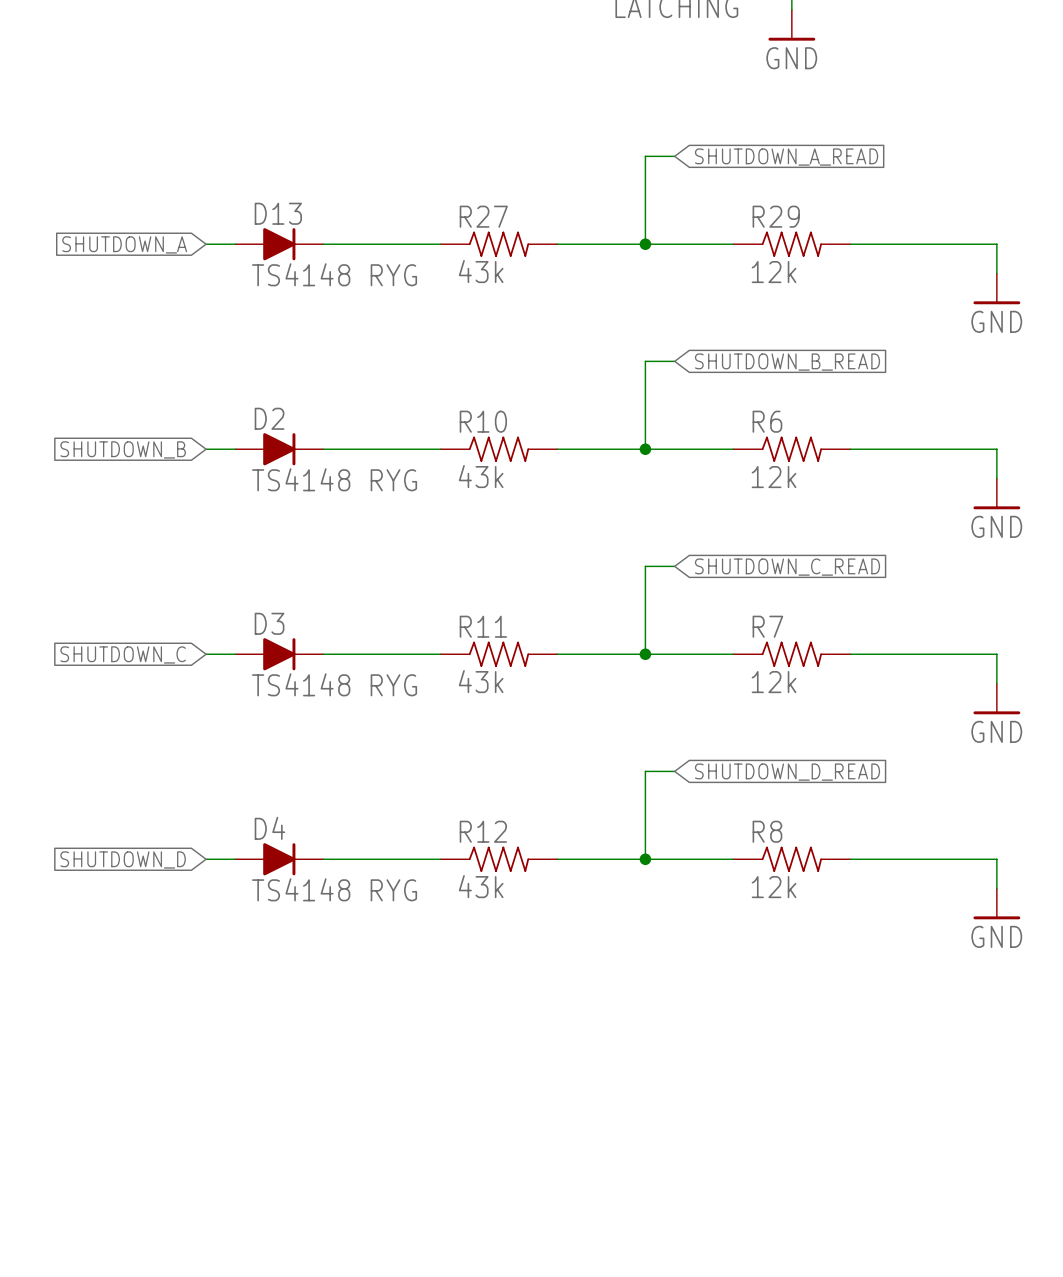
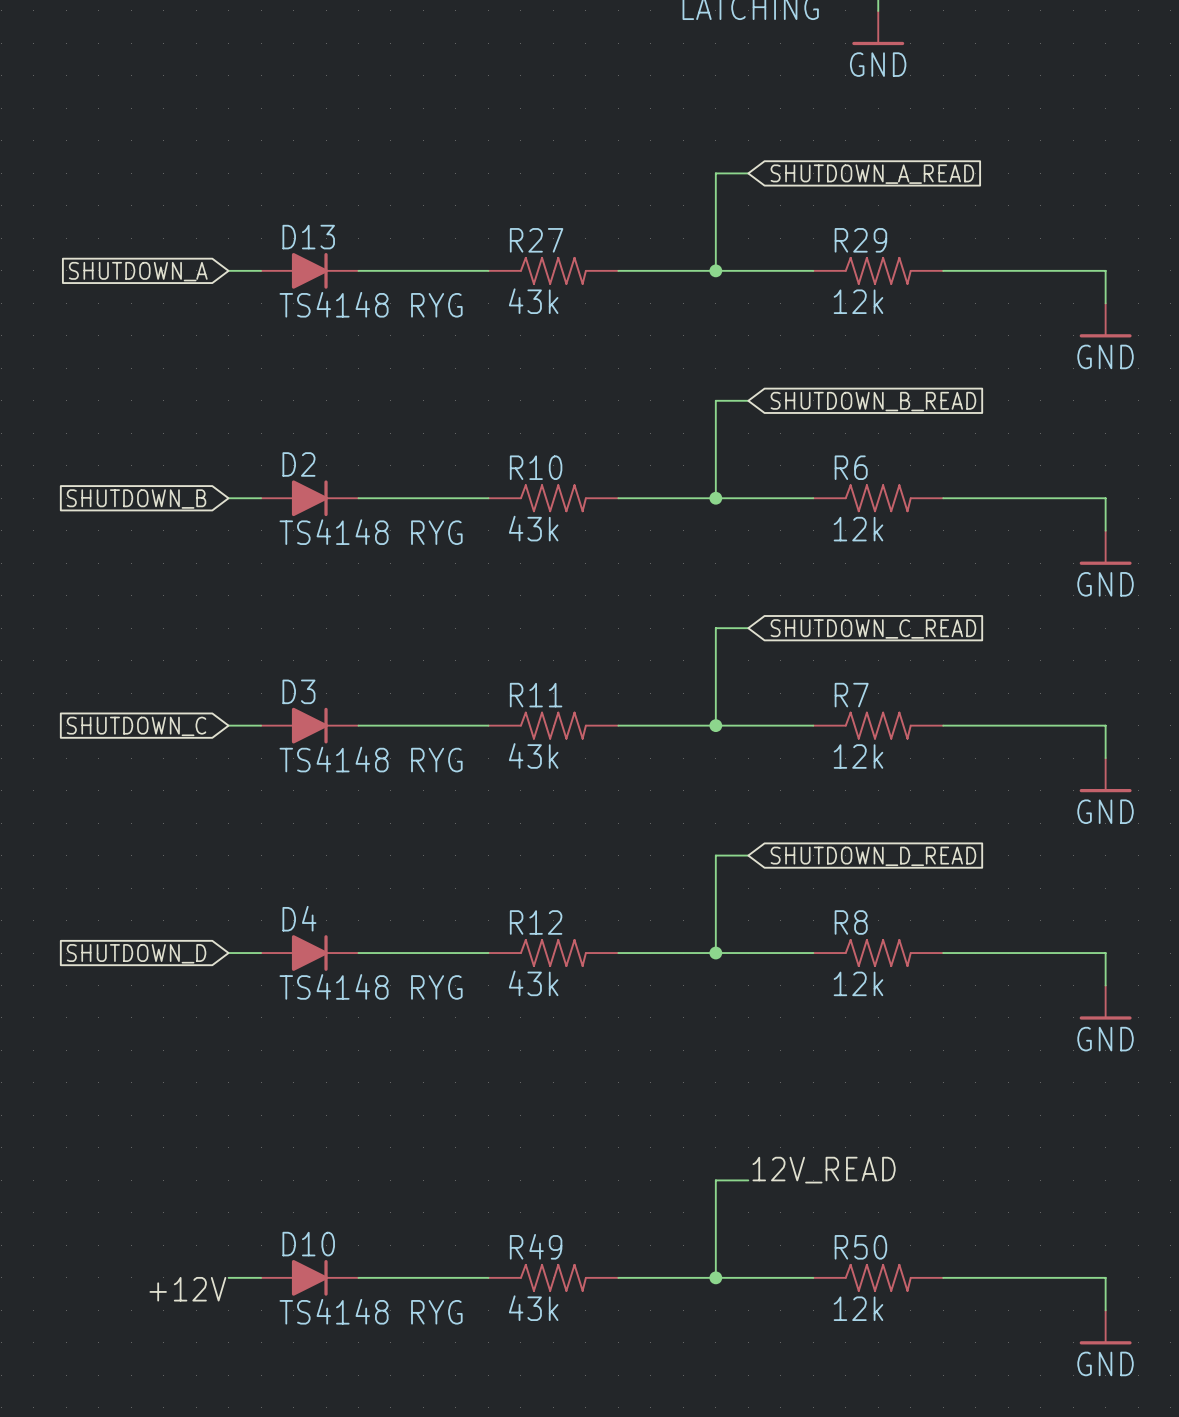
label: none -> 12V_READ (824, 1170)
wire: none -> (748, 1180) (715, 1180) (715, 1277)
wire: none -> (228, 1277) (261, 1277)
D10: none -> TS4148 RYG (309, 1277)
wire: none -> (358, 1277) (488, 1277)
R49: none -> 43k (553, 1277)
wire: none -> (618, 1277) (813, 1277)
junction: none -> (715, 1277)
R50: none -> 12k (878, 1277)
wire: none -> (943, 1277) (1105, 1277) (1105, 1310)
label: none -> +12V (187, 1289)
power symbol: none -> GND (1105, 1327)

